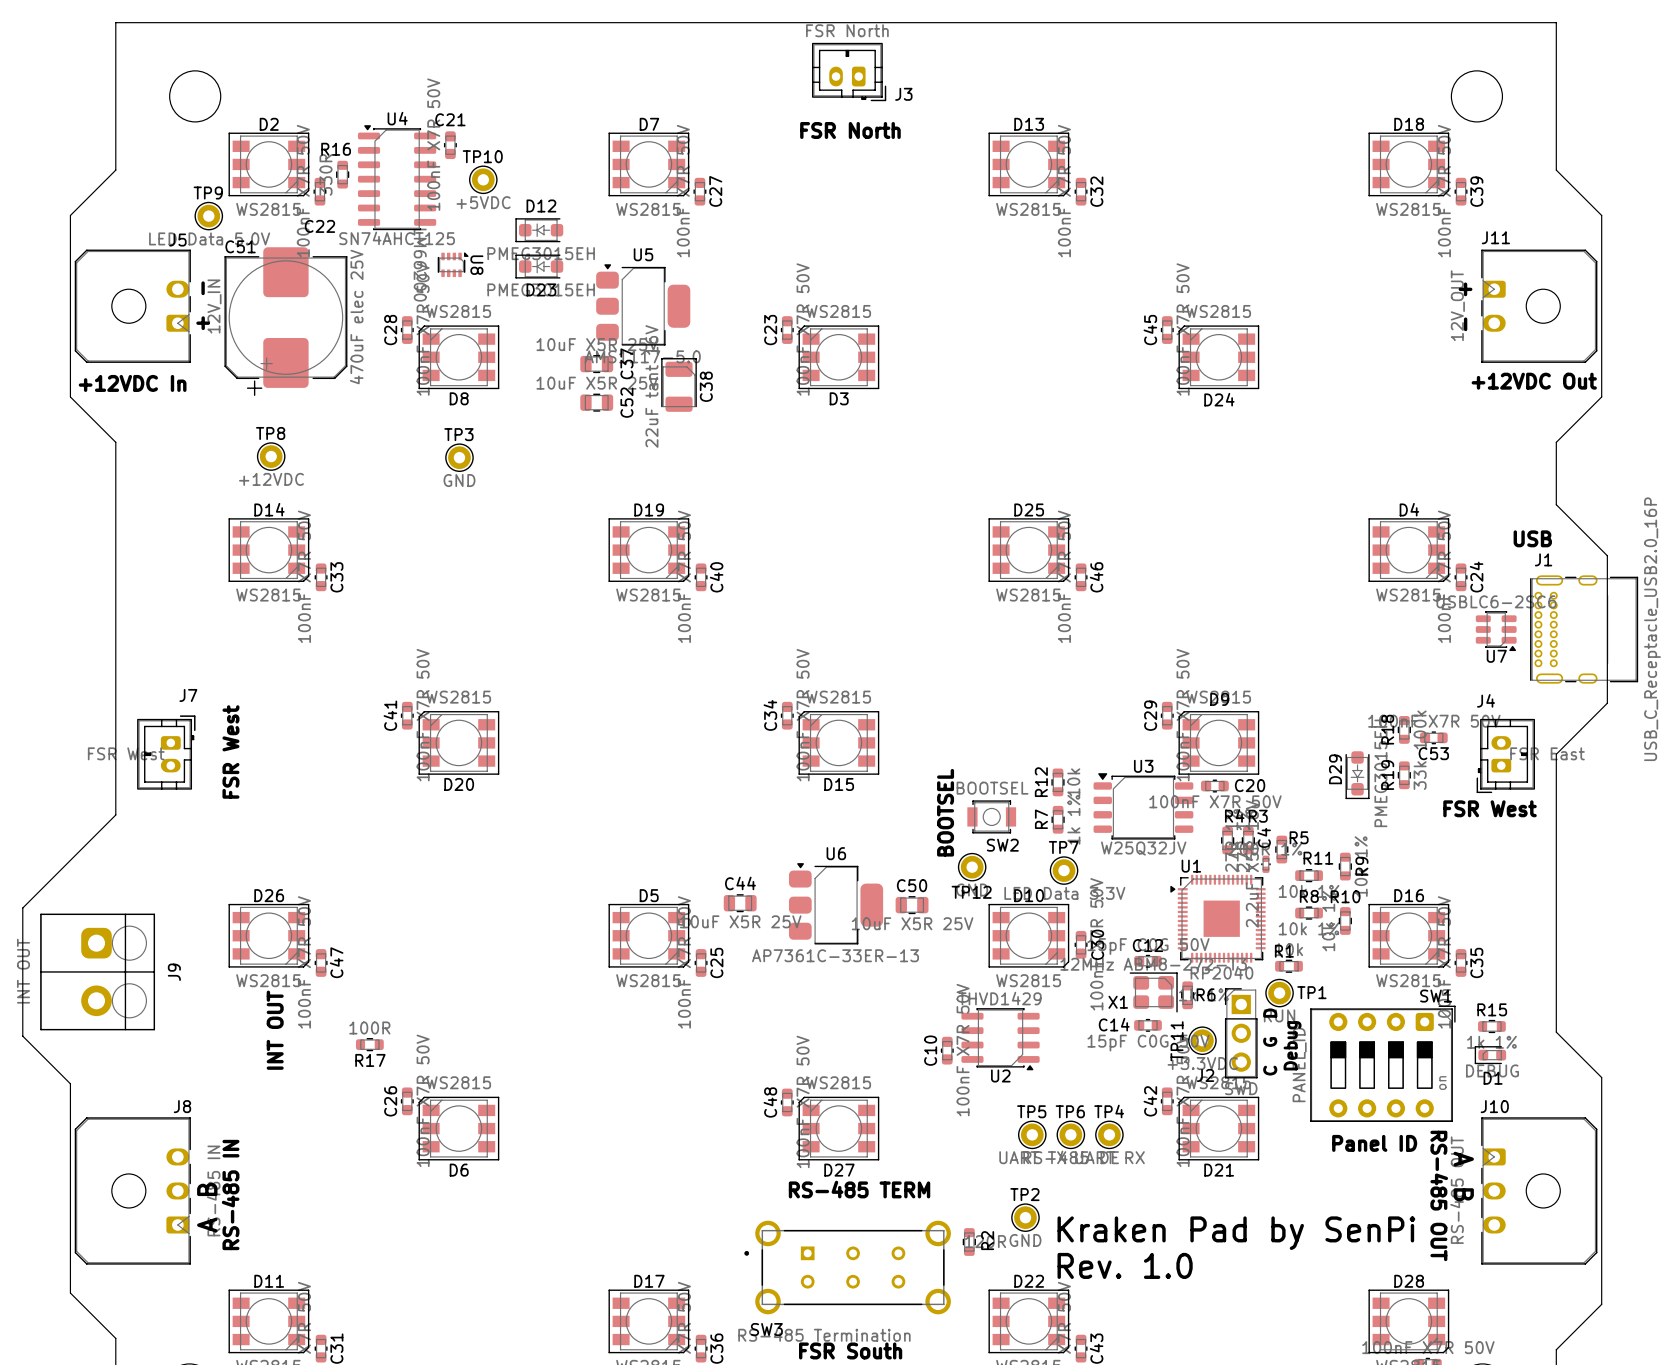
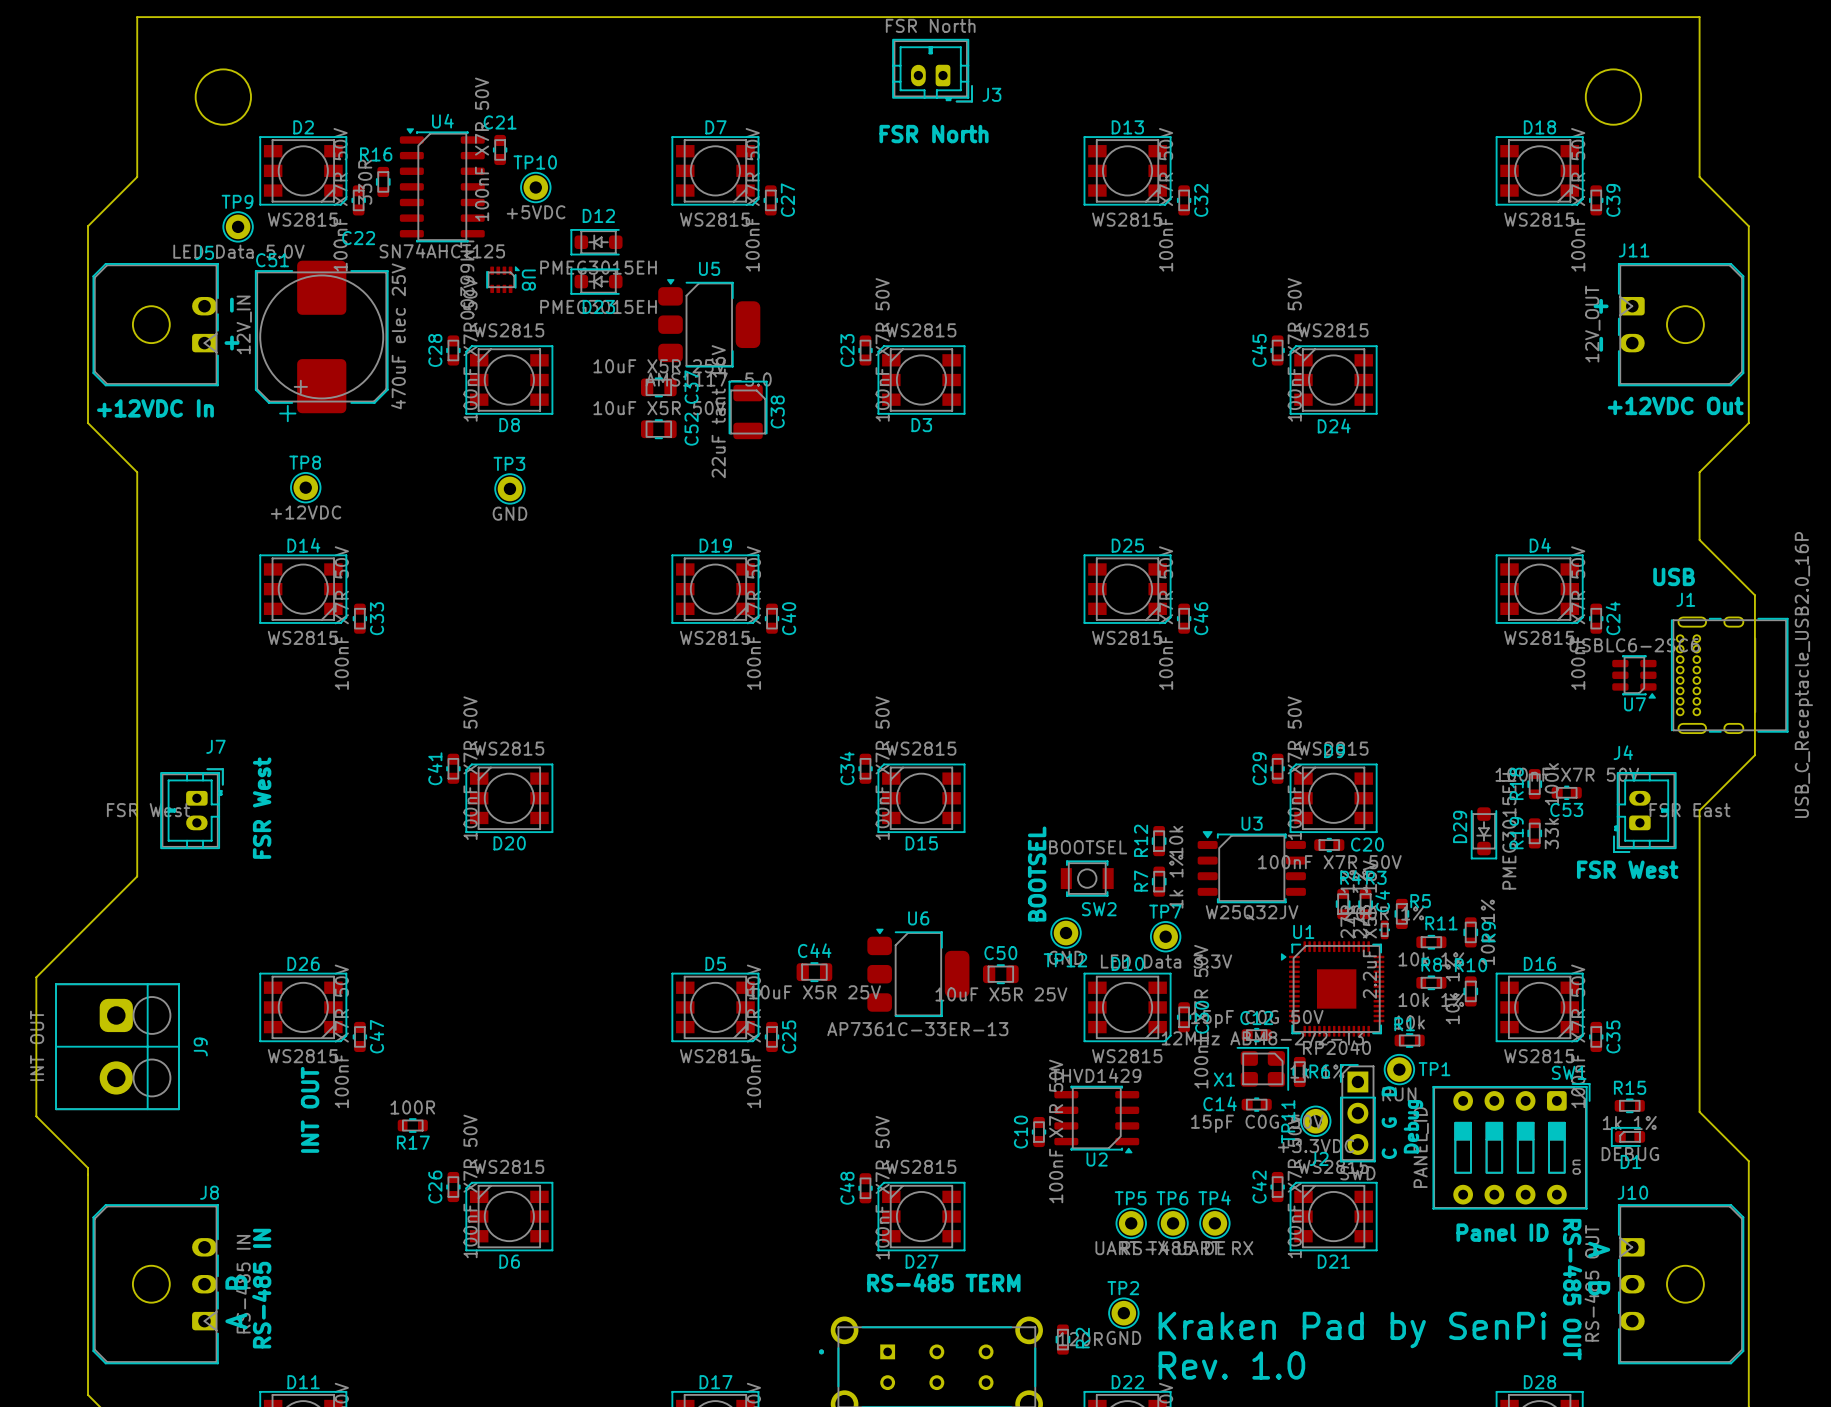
C52 value: 10uF X5R 25V (597, 383) -> 10uF X5R 50V (659, 408)

